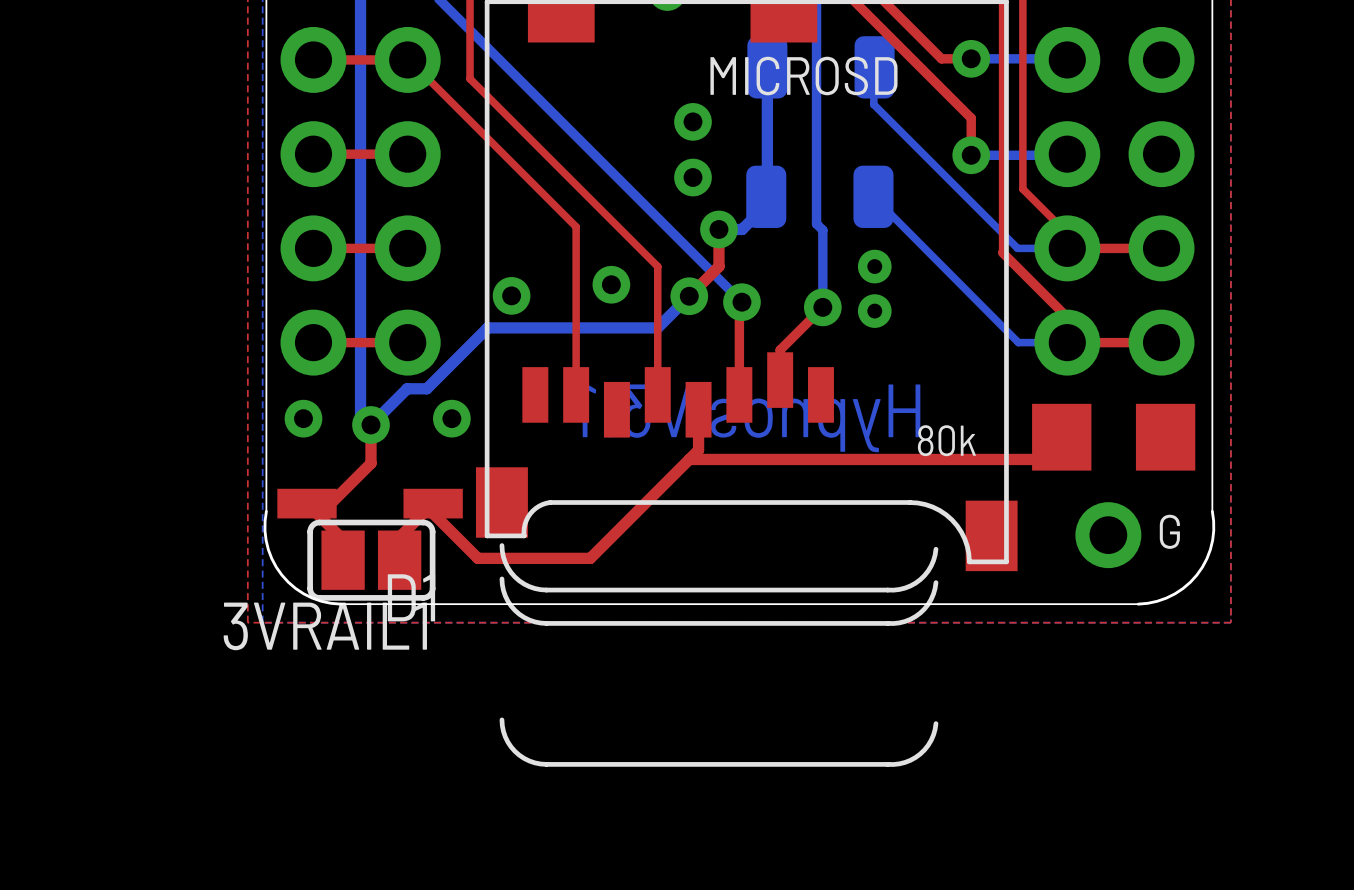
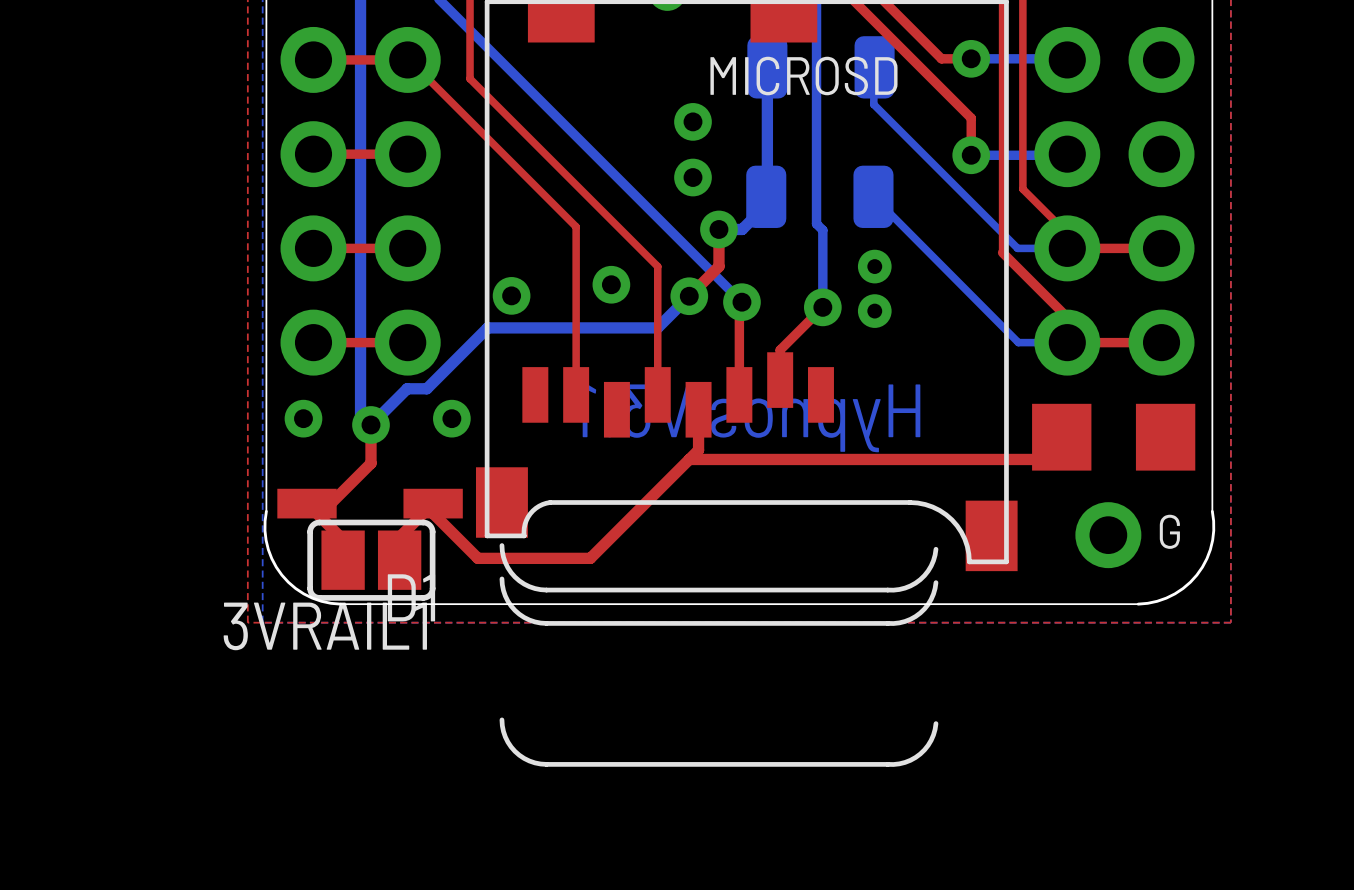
text: 80k (946, 440) -> none

